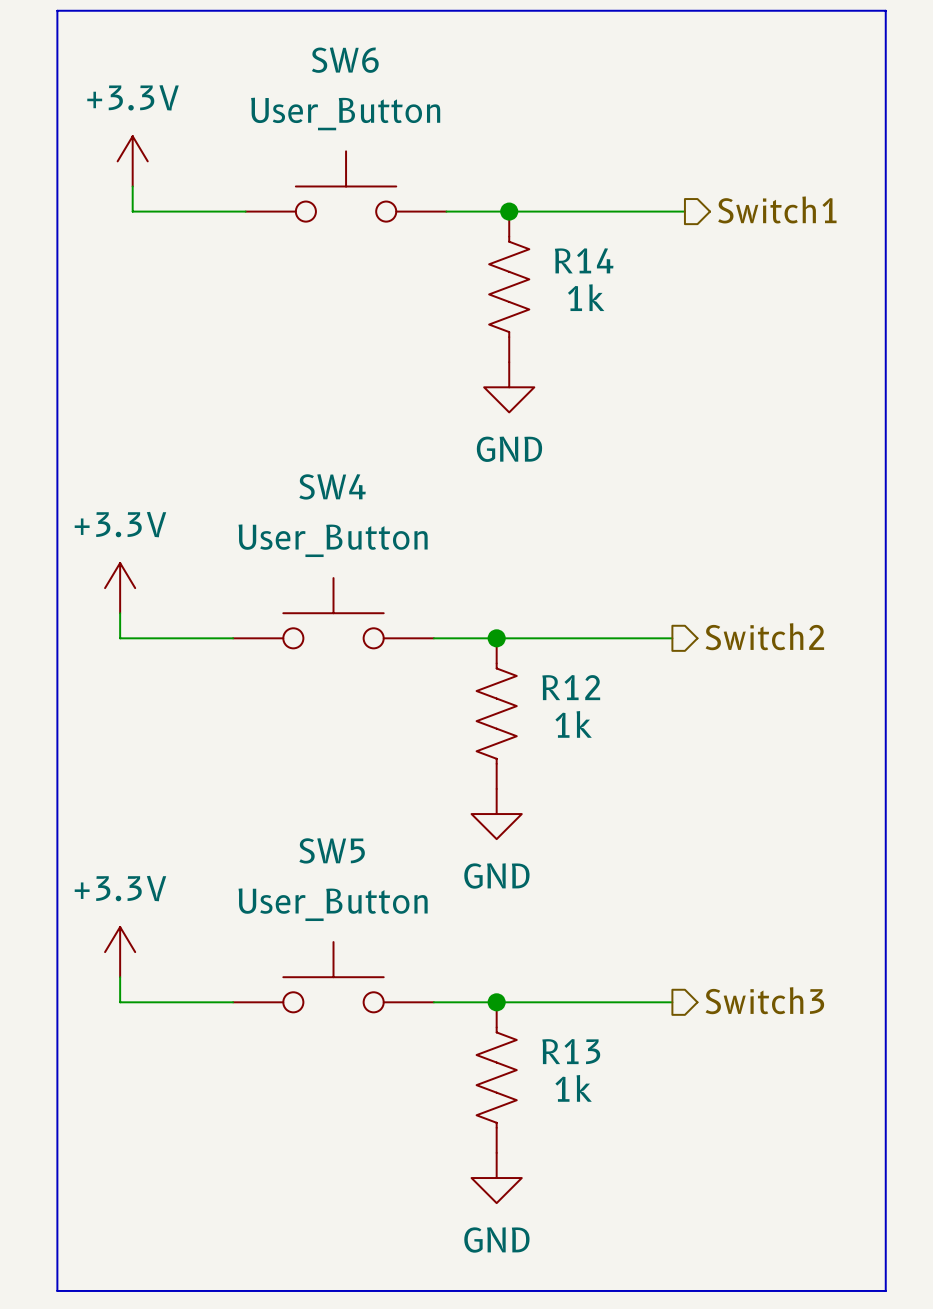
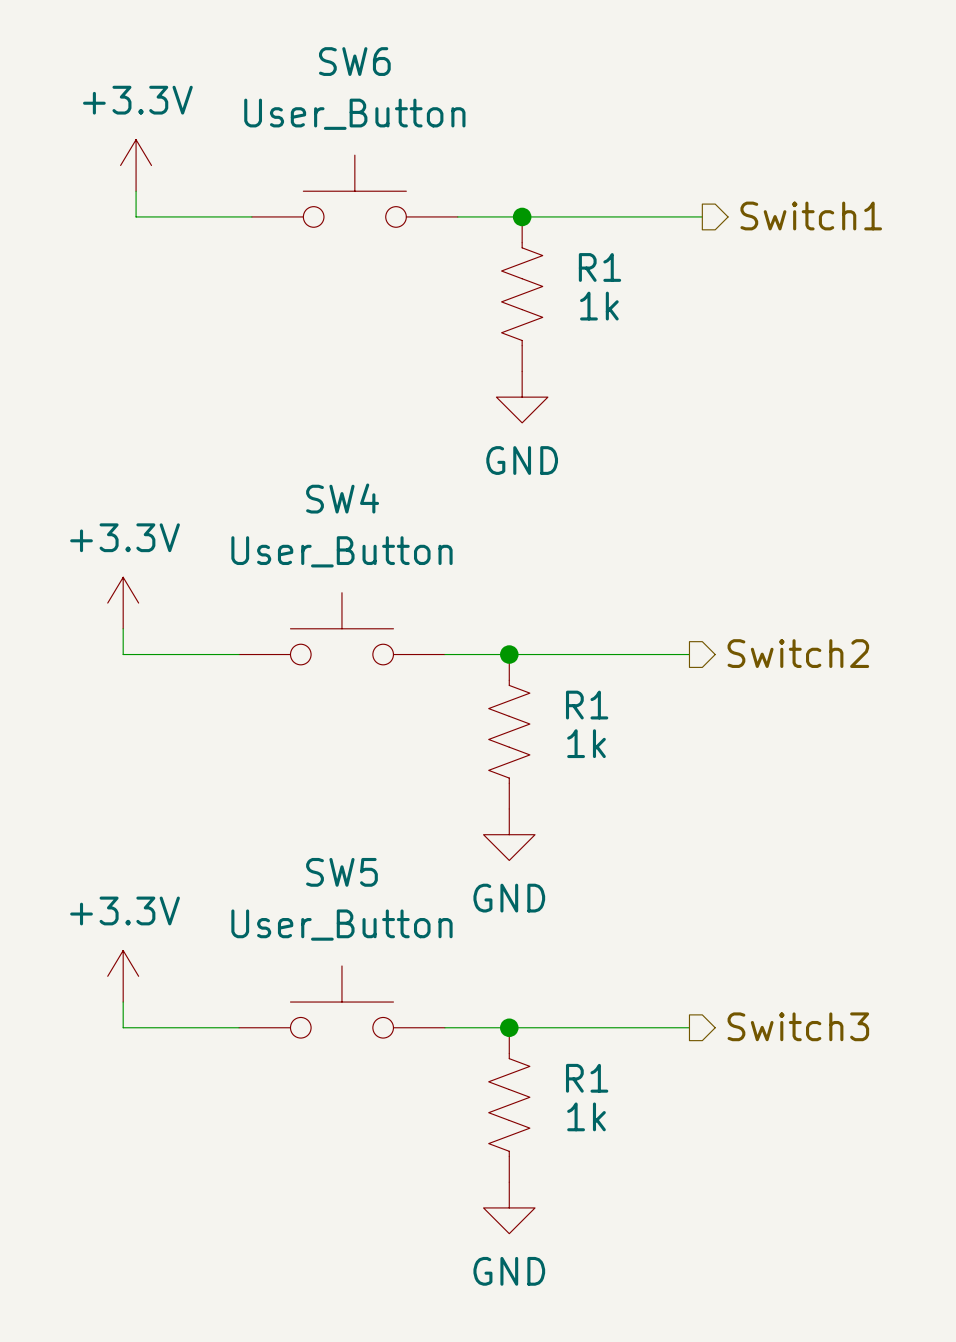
line: (57, 10) (885, 10) (885, 1290) (57, 1290) (57, 10) -> none
R14 name: R14 (584, 260) -> R1 (599, 267)
R12 name: R12 (571, 687) -> R1 (587, 705)
R13 name: R13 (571, 1051) -> R1 (587, 1078)

